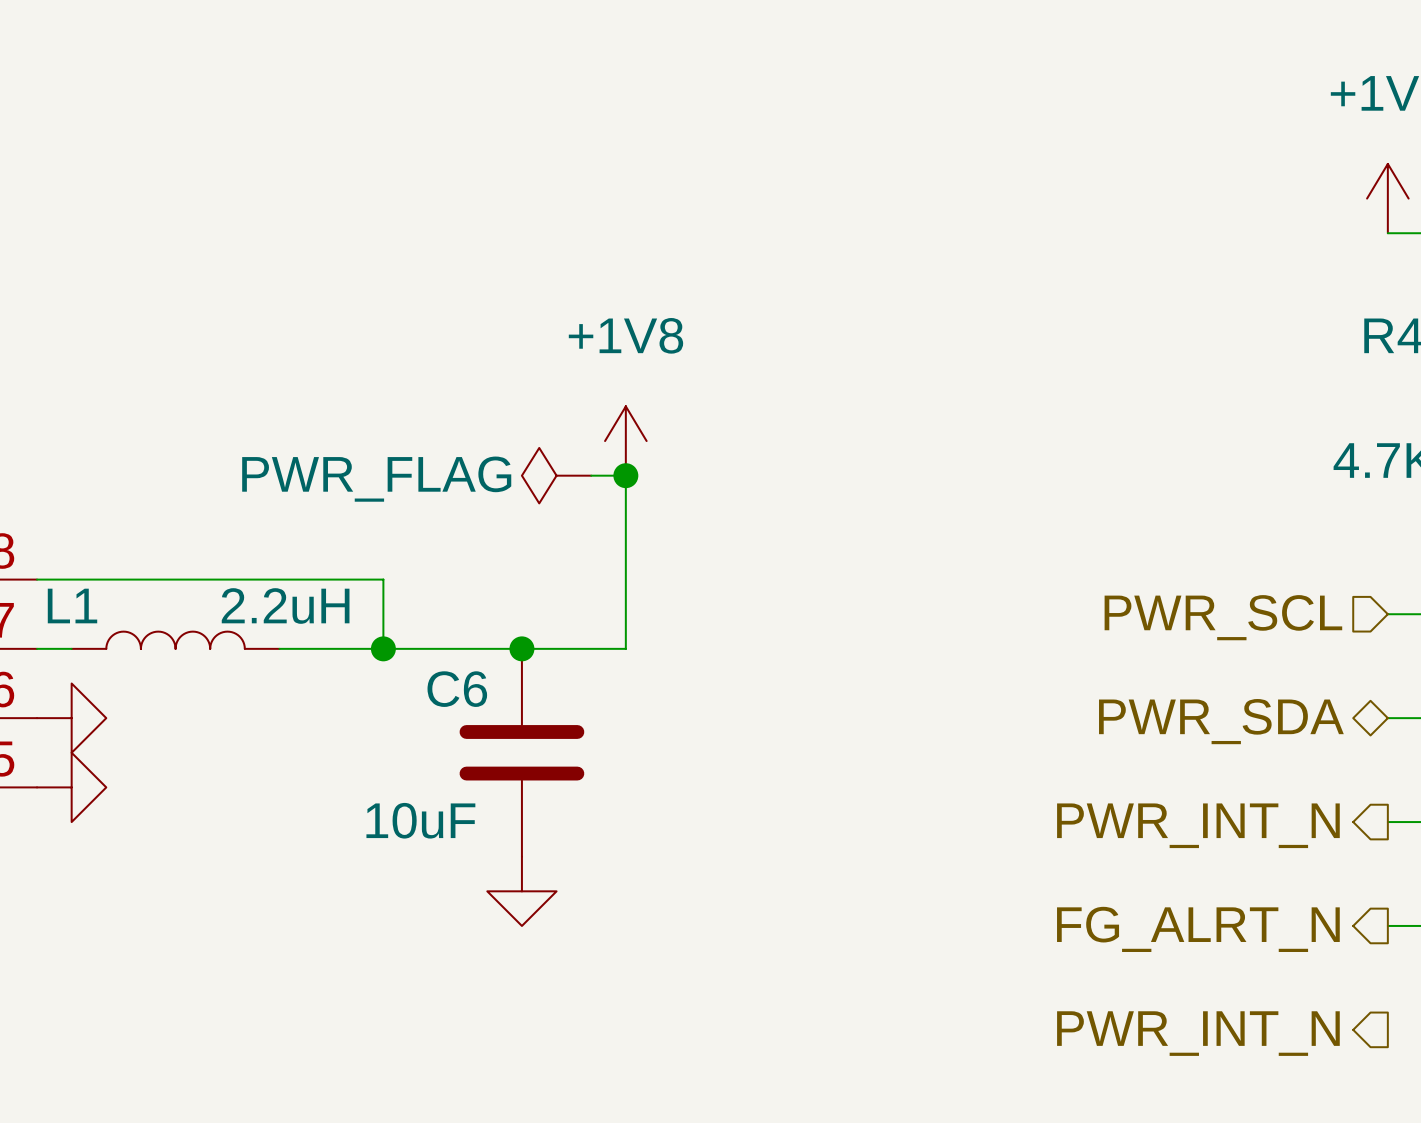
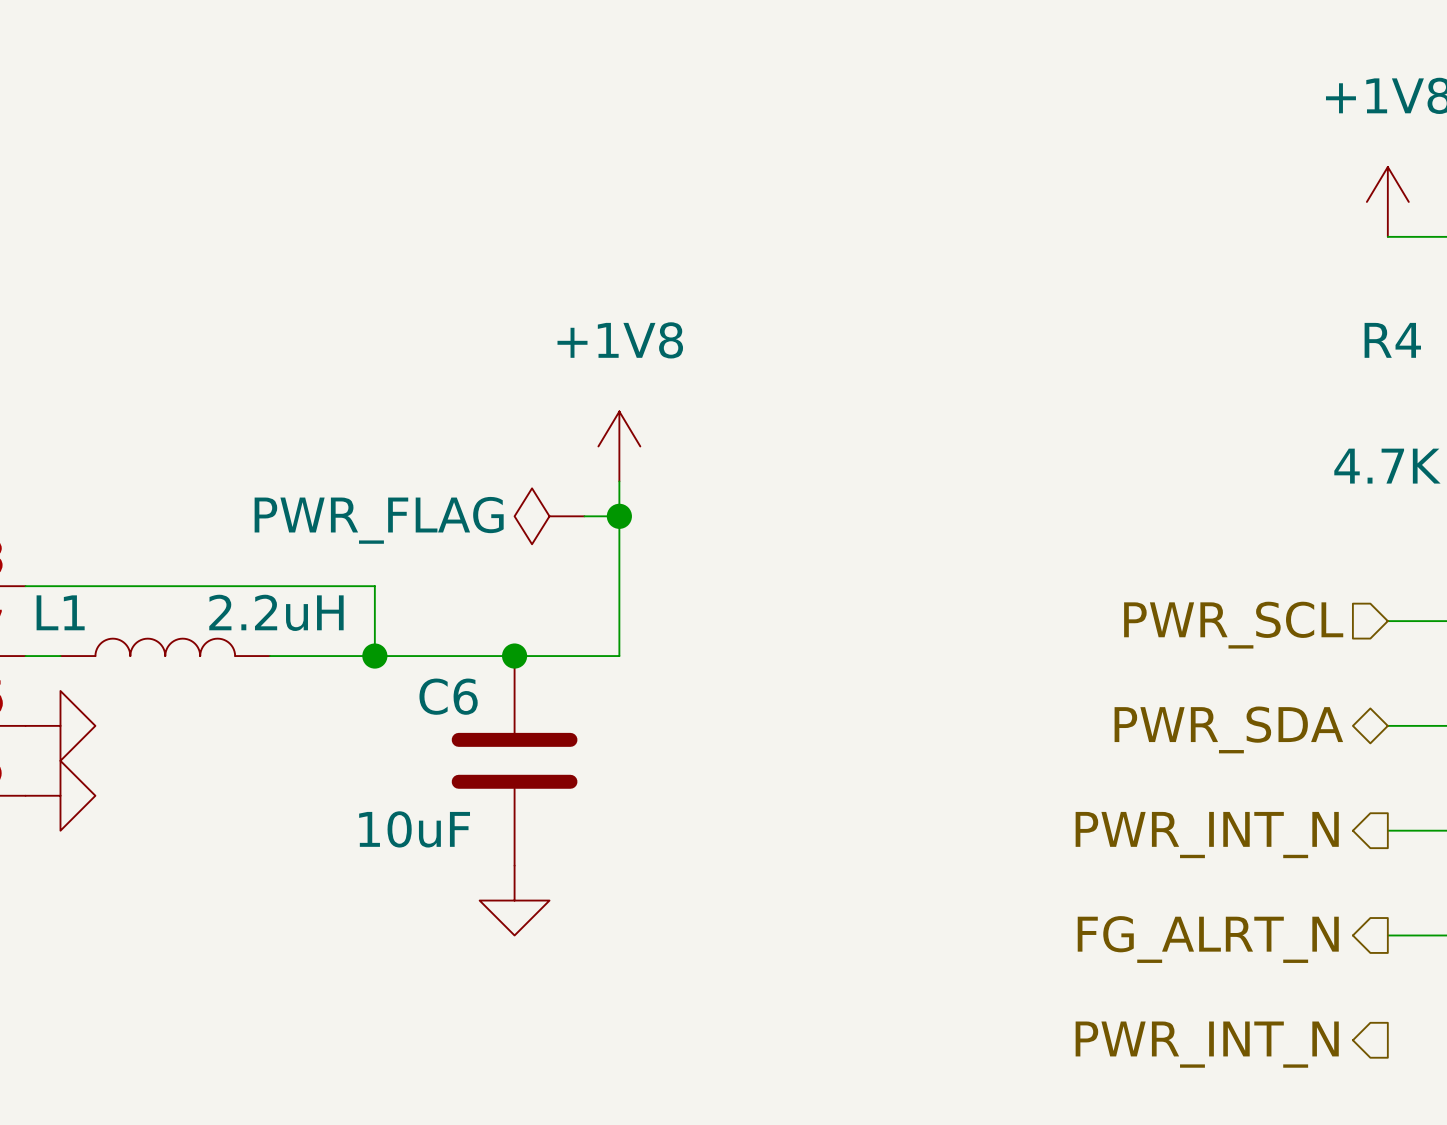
power symbol position: PWR_FLAG (556, 475) -> PWR_FLAG (549, 516)
wire: (591, 475) (625, 475) -> (584, 516) (619, 516)
junction position: (625, 475) -> (619, 516)

